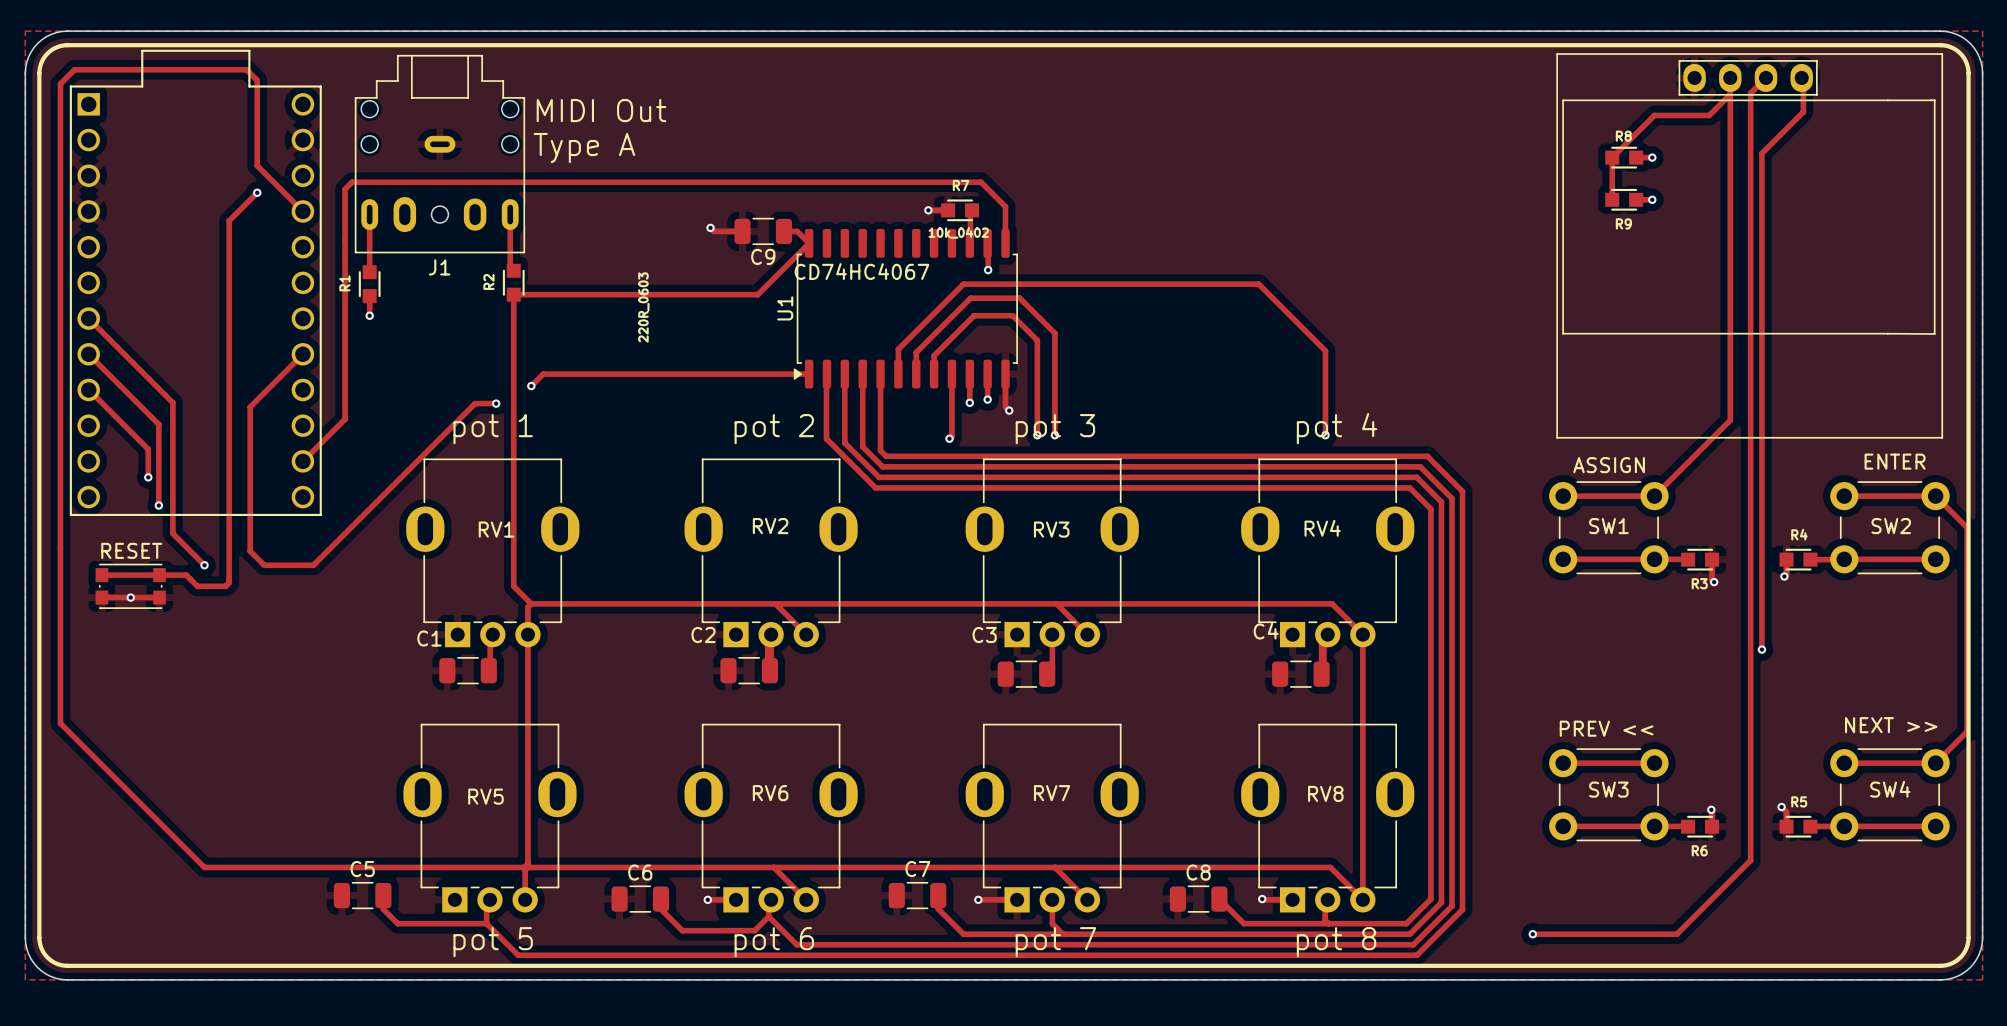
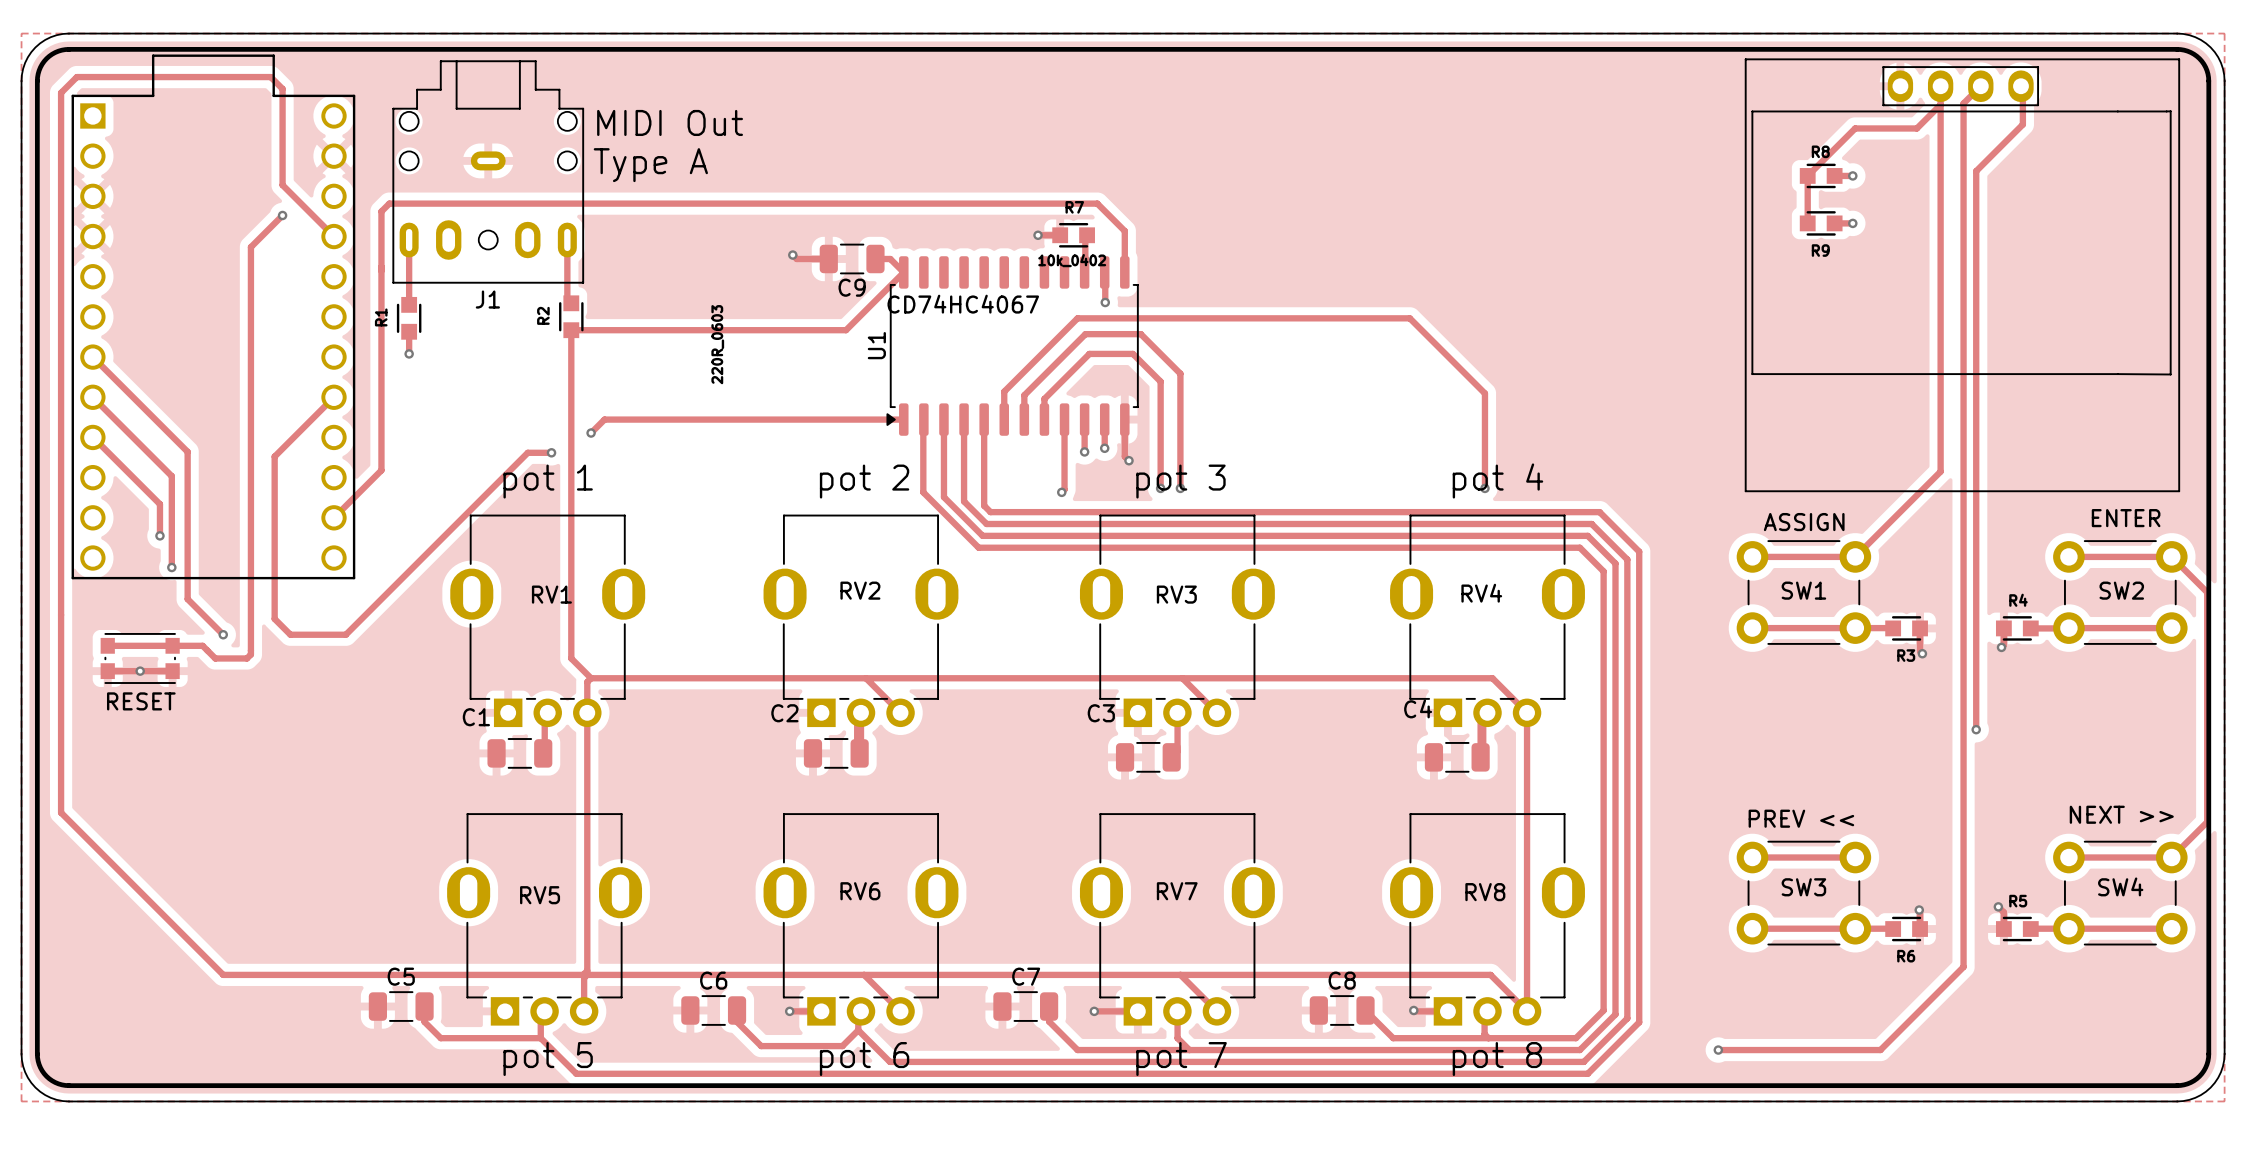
part value position: RESET (131, 550) -> RESET (141, 701)

